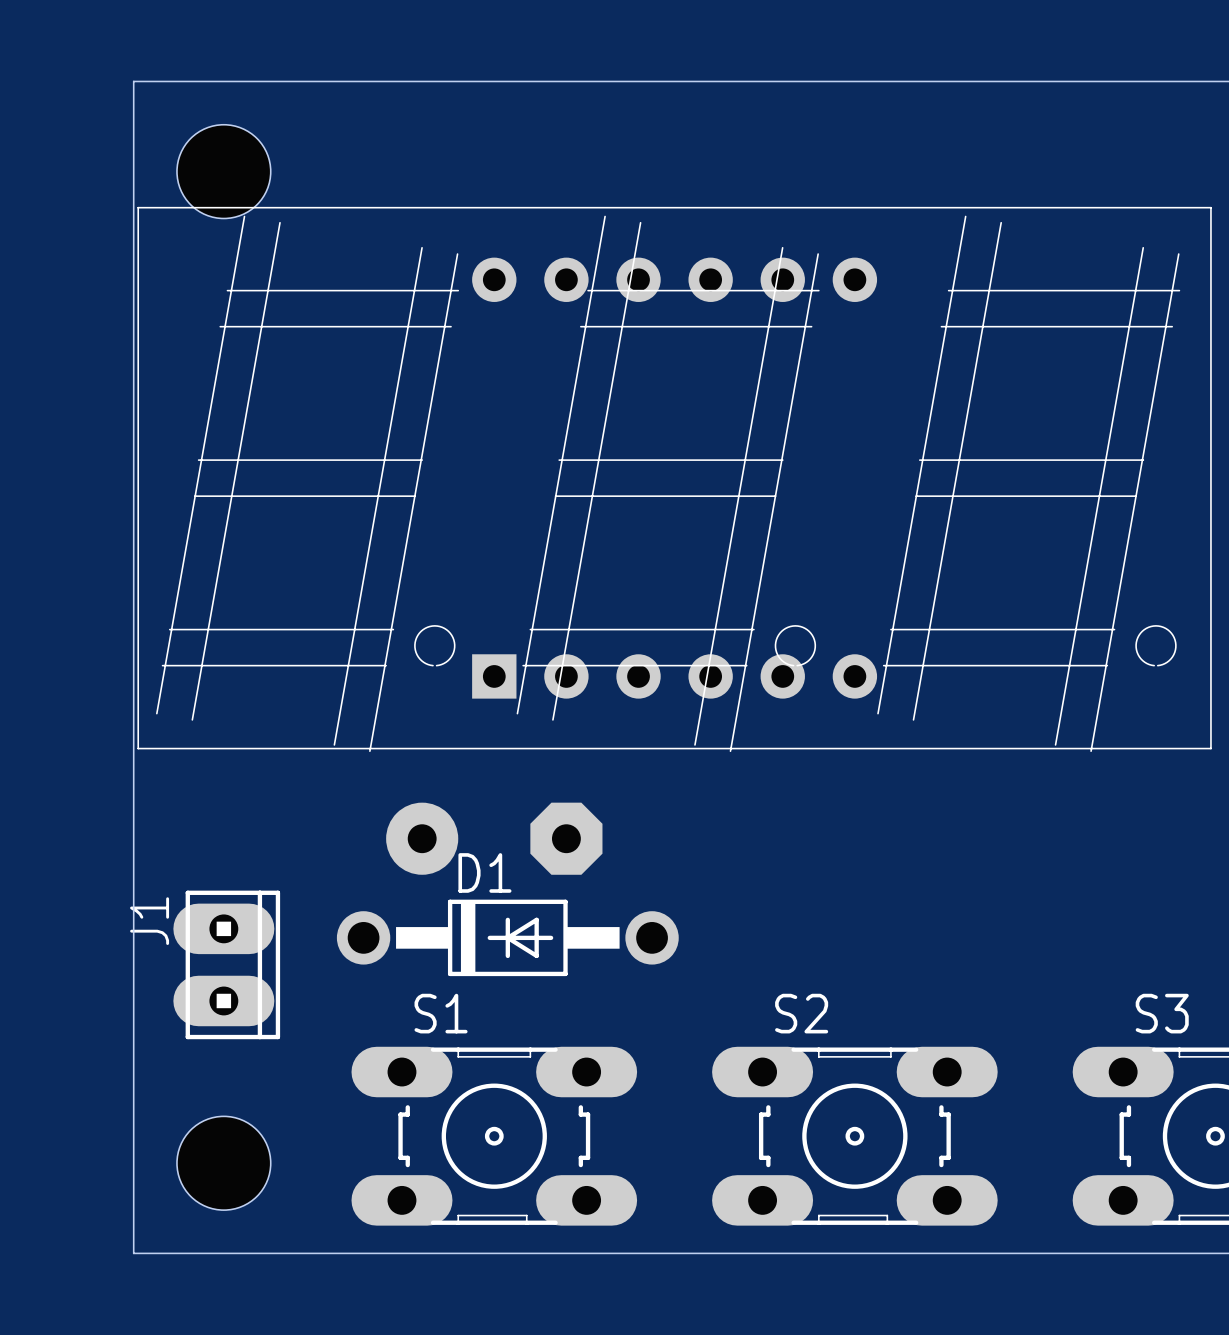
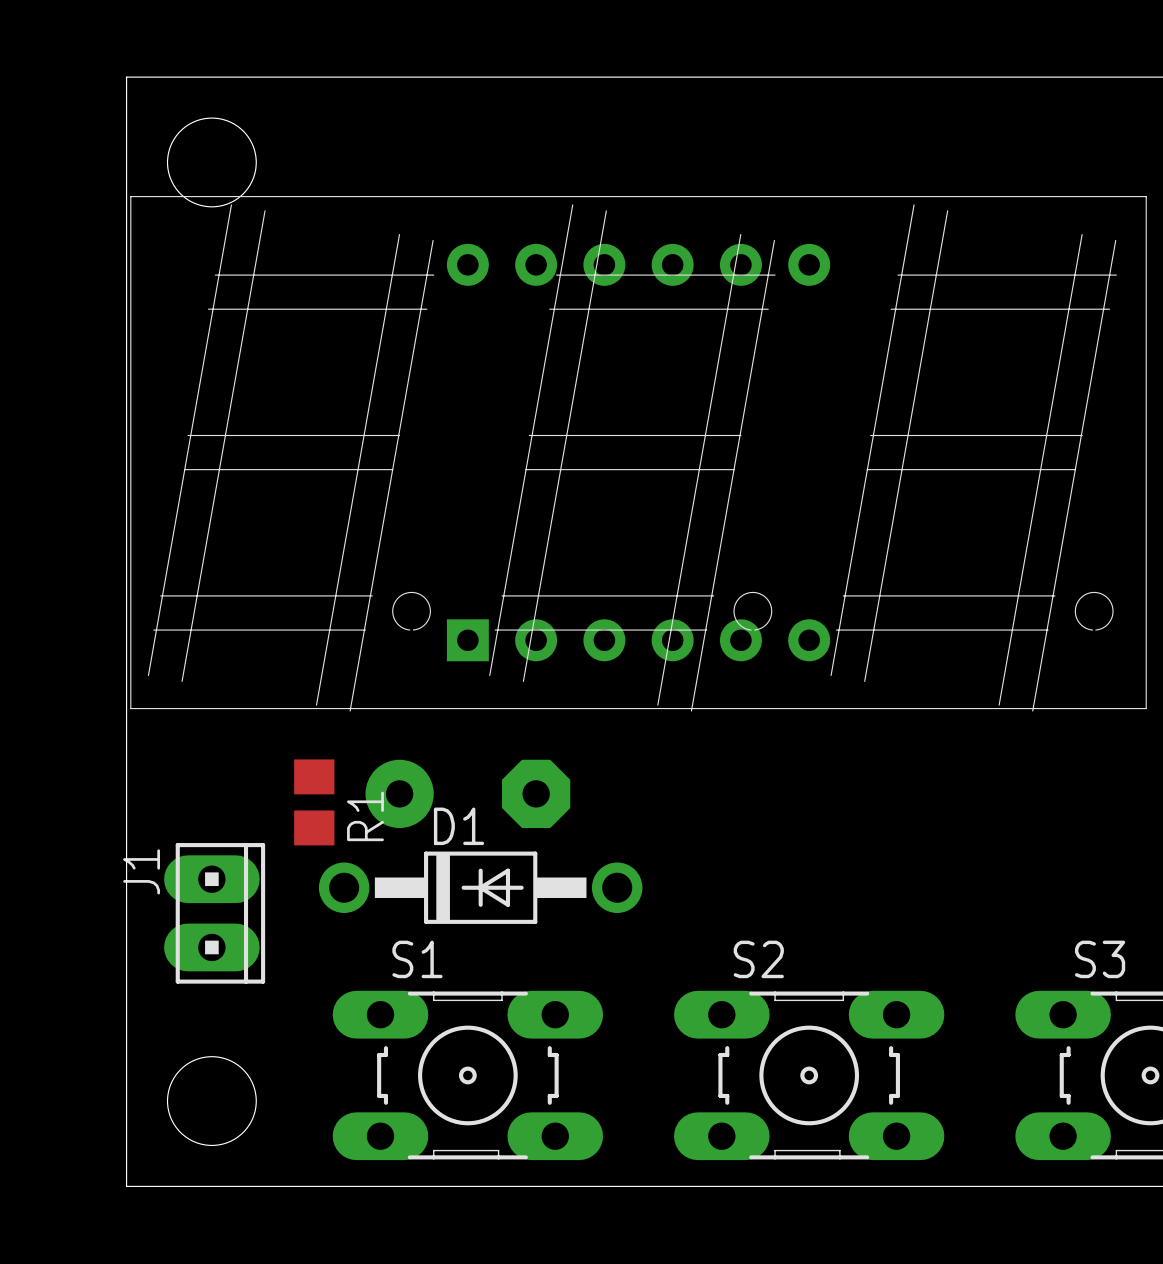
R1: none -> (314, 802)

